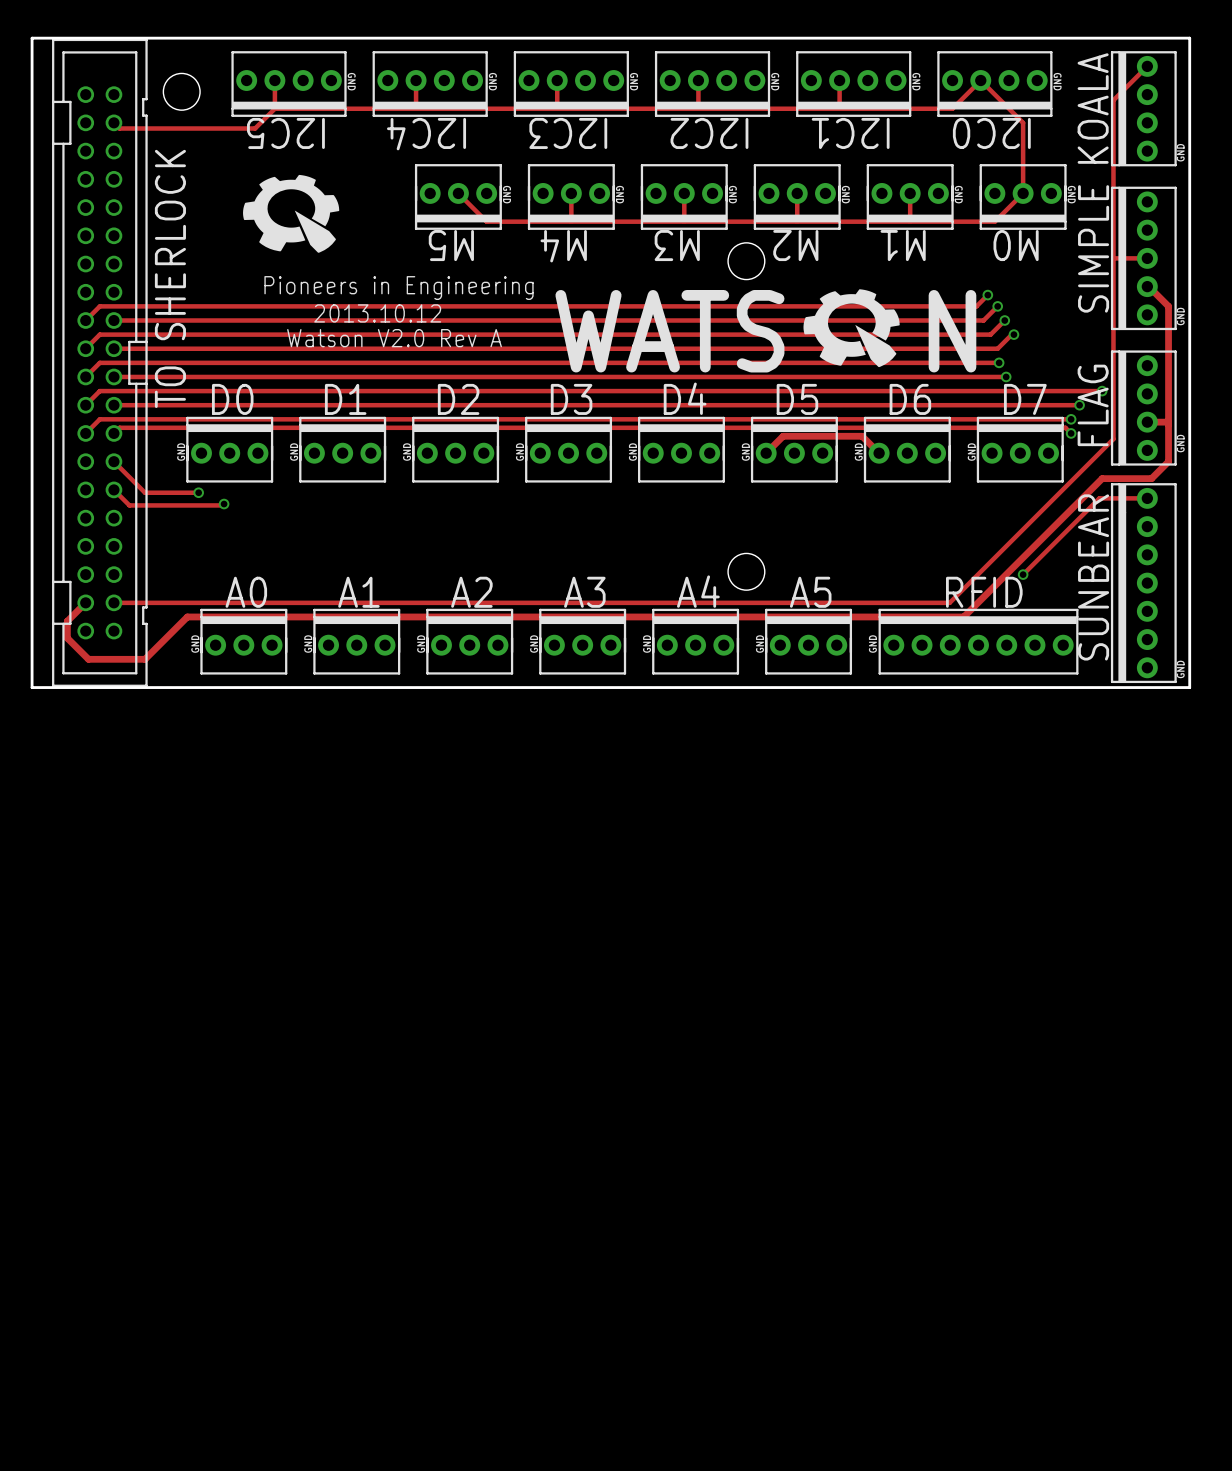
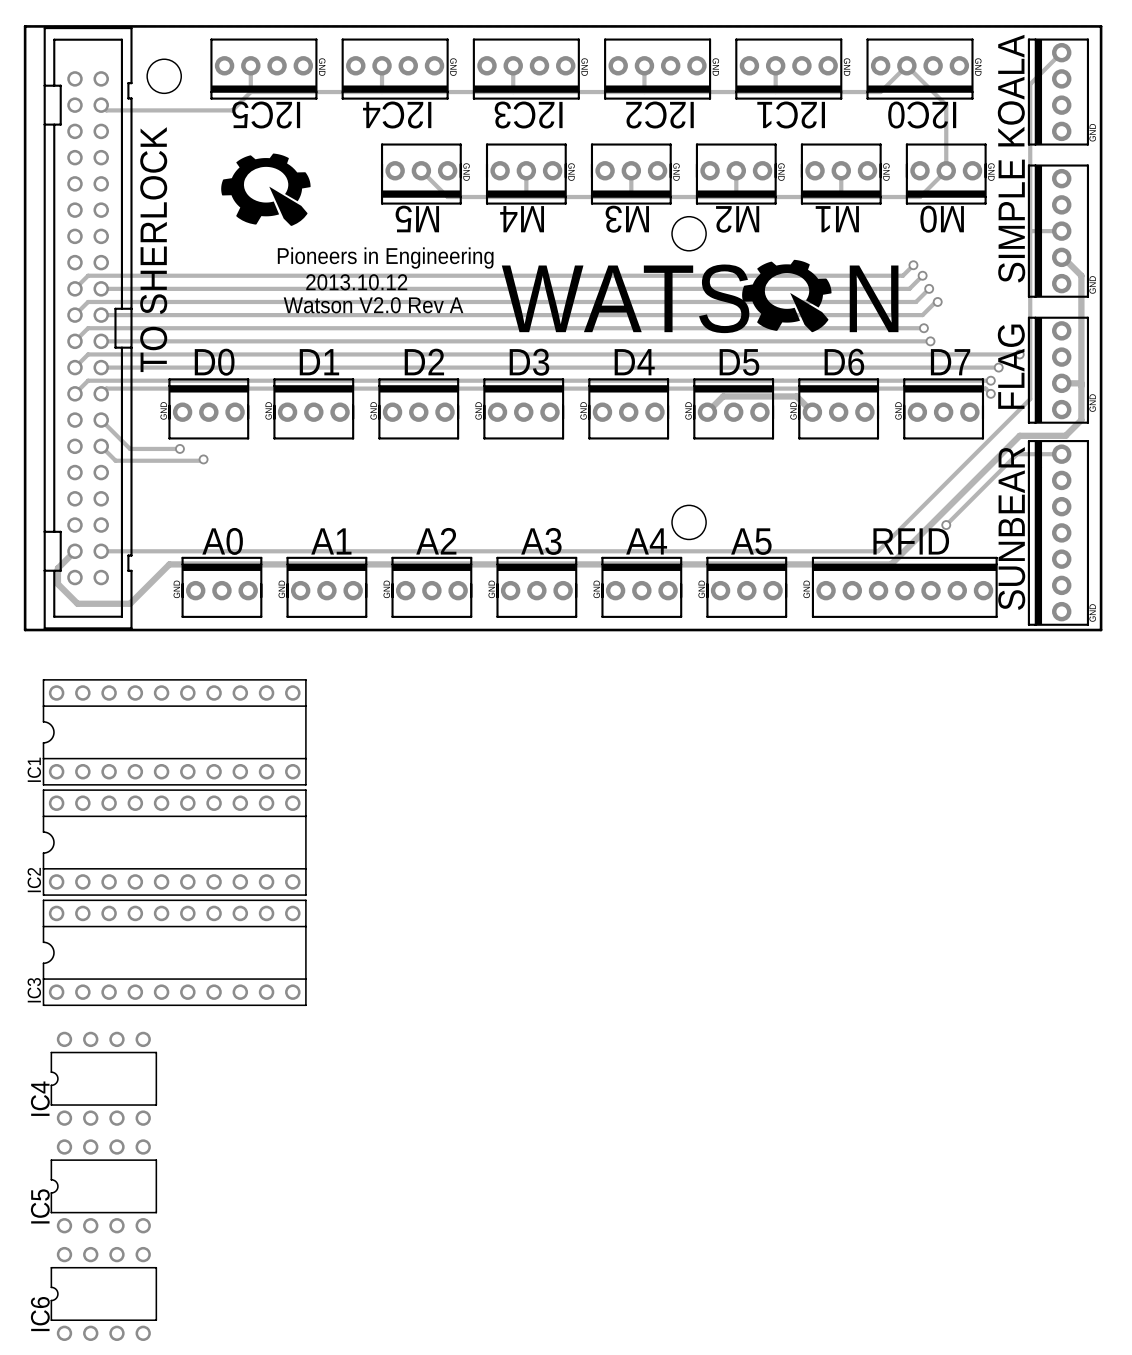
IC1: none -> (174, 732)
IC2: none -> (174, 842)
IC3: none -> (174, 952)
IC4: none -> (103, 1078)
IC5: none -> (103, 1186)
IC6: none -> (103, 1293)

